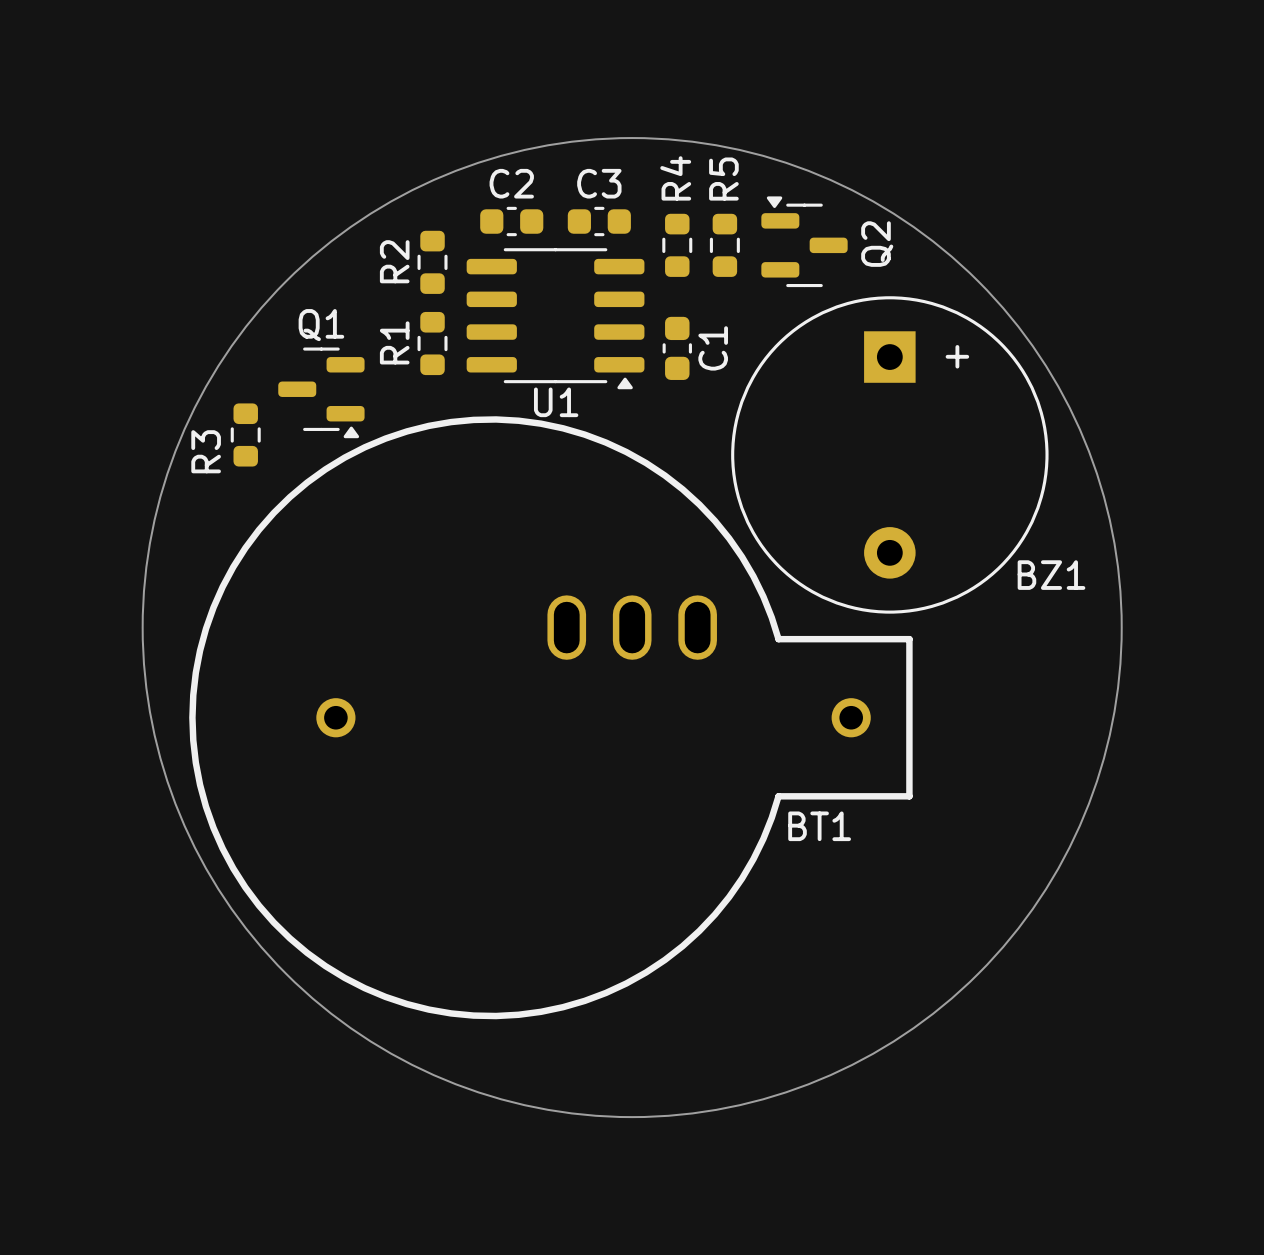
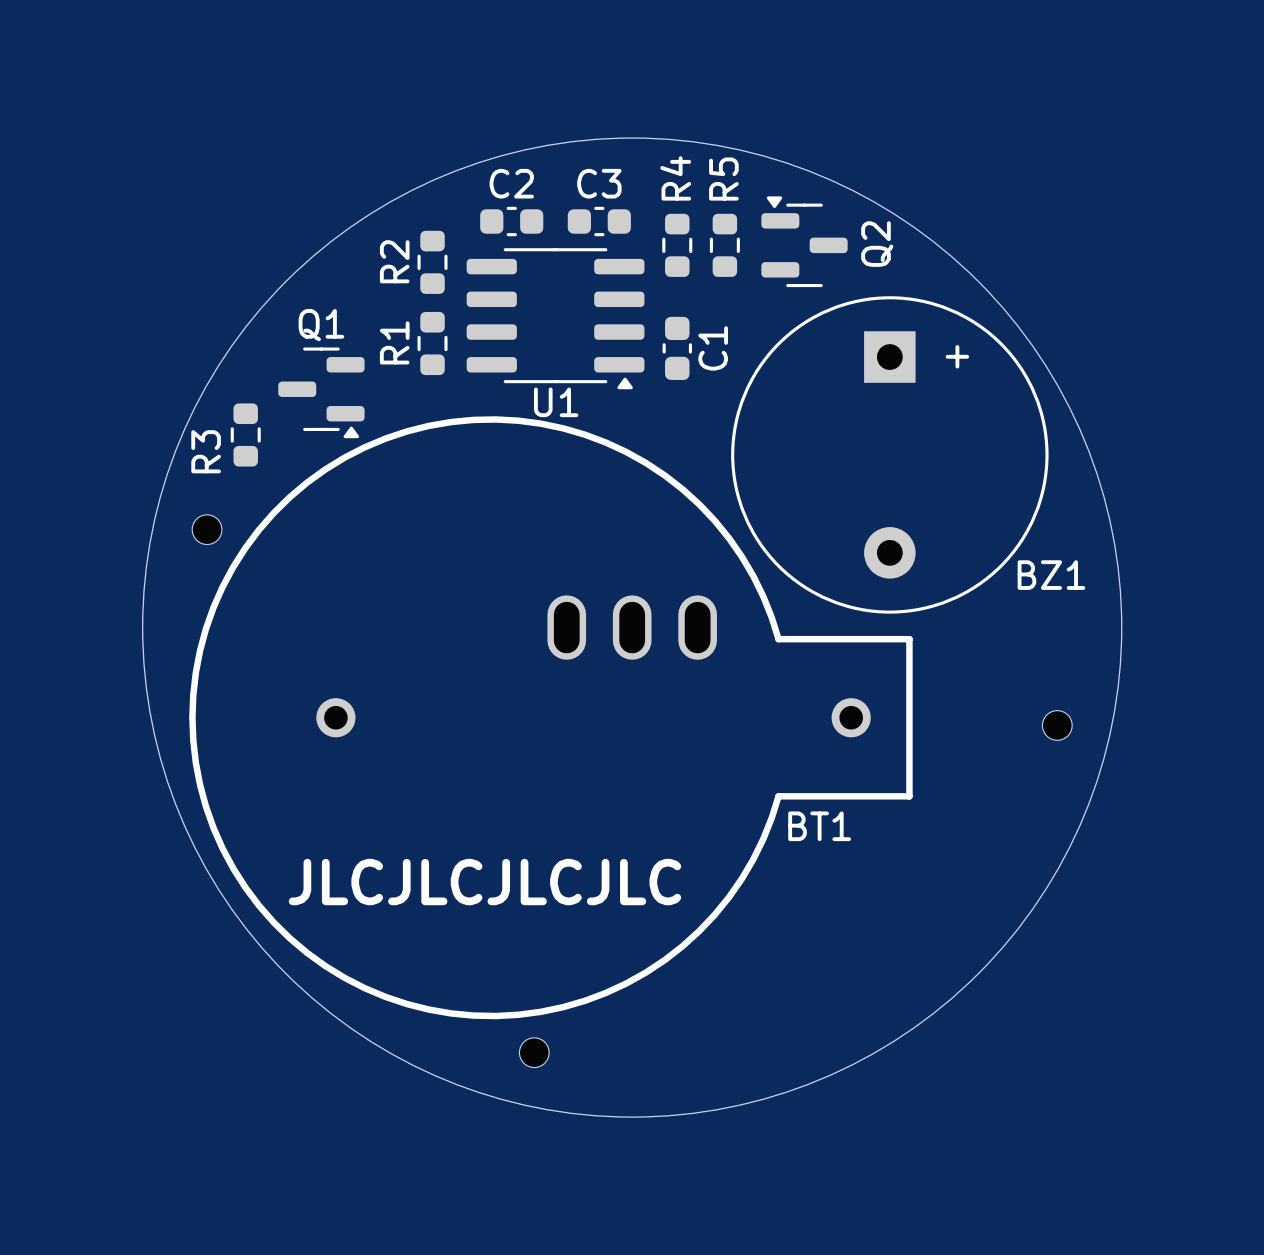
part: none -> (207, 529)
part: none -> (1057, 725)
text: none -> JLCJLCJLCJLC (484, 882)
part: none -> (534, 1052)

